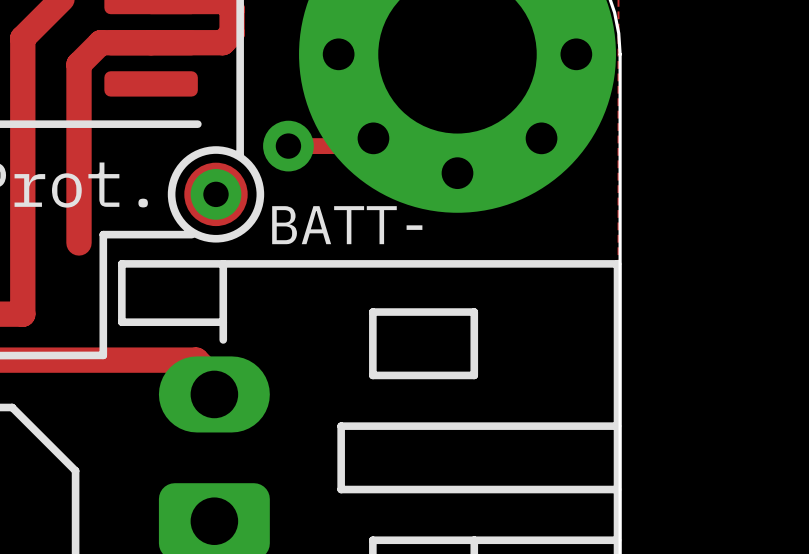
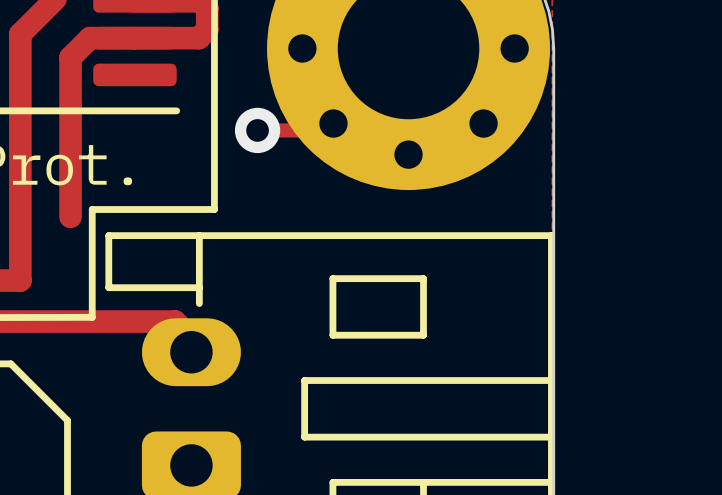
line: none -> (214, 137) (214, 209) (171, 209)
BATT-: (215, 194) -> none
via: (215, 194) -> none

